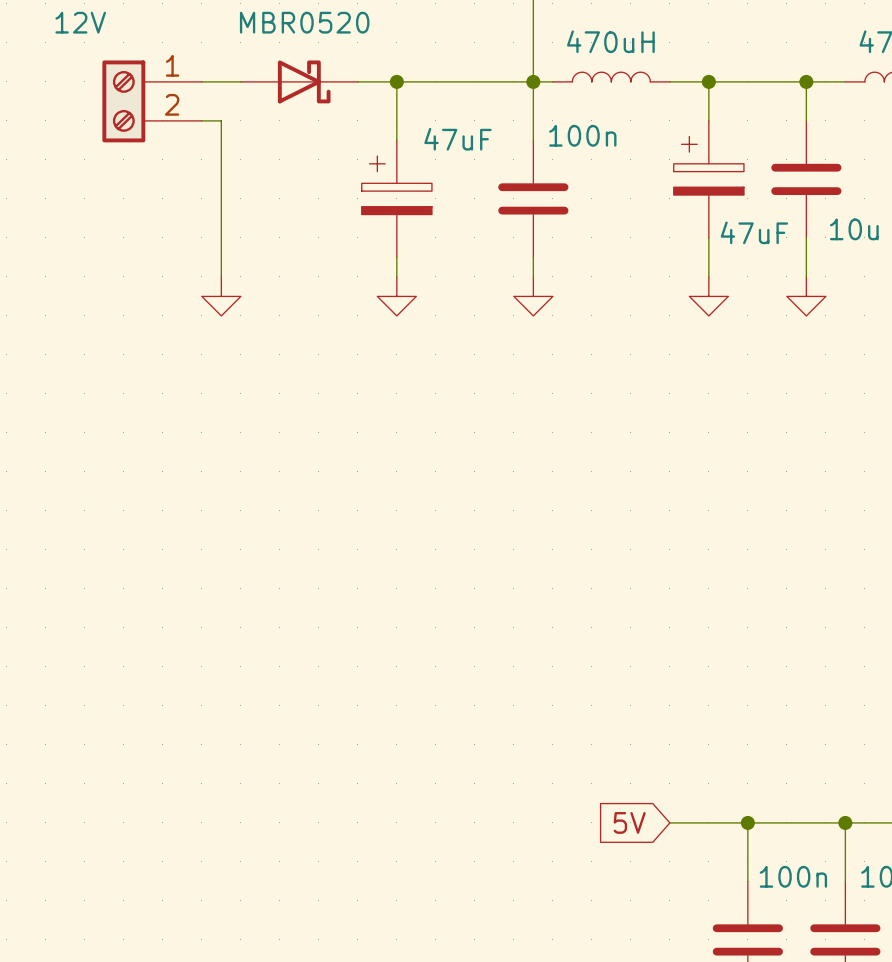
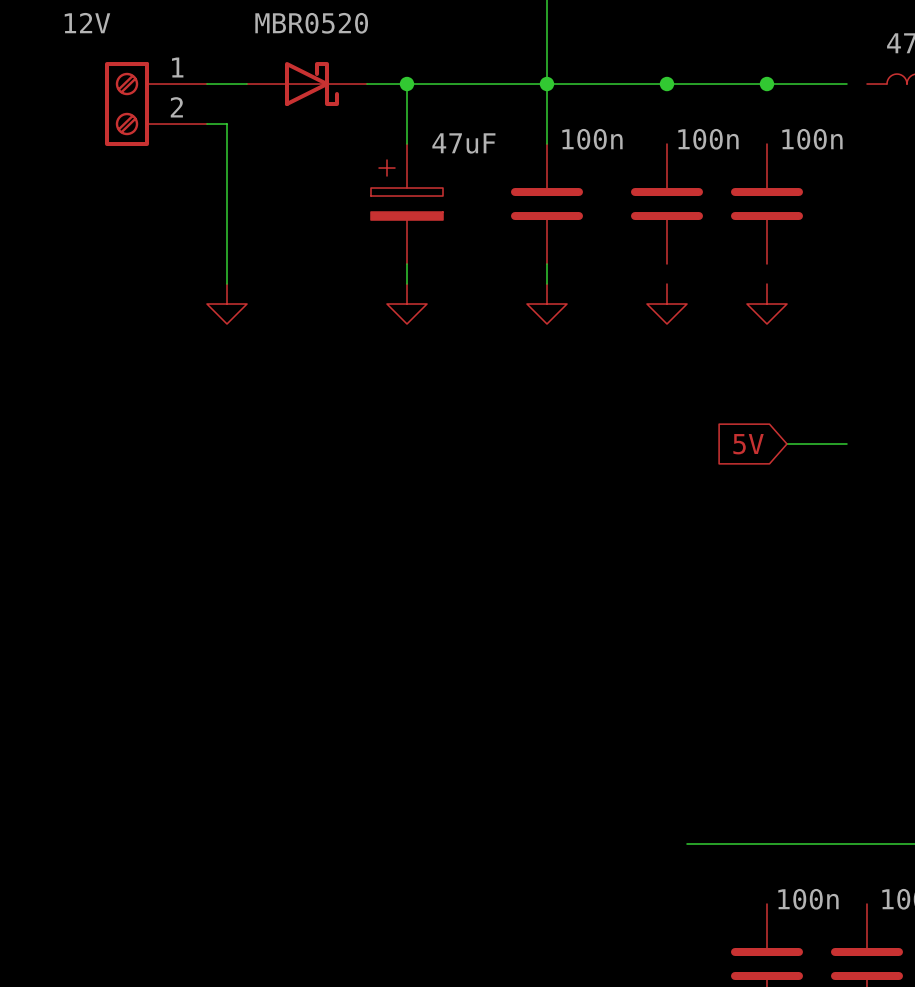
part: 470uH (611, 77) -> none
wire: none -> (566, 84) (686, 84)
junction: none -> (666, 84)
wire: (708, 81) (708, 120) -> none
junction: (708, 81) -> none
junction: none -> (766, 84)
wire: (806, 81) (806, 120) -> none
junction: (806, 81) -> none
wire: (825, 81) (845, 81) -> none
part: 47uF (708, 179) -> none
part: 10u (806, 179) -> none
part: none -> 100n (666, 204)
part: none -> 100n (766, 204)
wire: (708, 237) (708, 276) -> none
wire: (806, 237) (806, 276) -> none
power symbol: none -> (666, 304)
power symbol: (708, 296) -> none
power symbol: none -> (766, 304)
power symbol: (806, 296) -> none
global label: none -> 5V (748, 444)
wire: none -> (786, 444) (846, 444)
global label: 5V (629, 822) -> none
wire: (747, 822) (747, 881) -> none
junction: (747, 822) -> none
wire: (845, 822) (845, 881) -> none
junction: (845, 822) -> none

